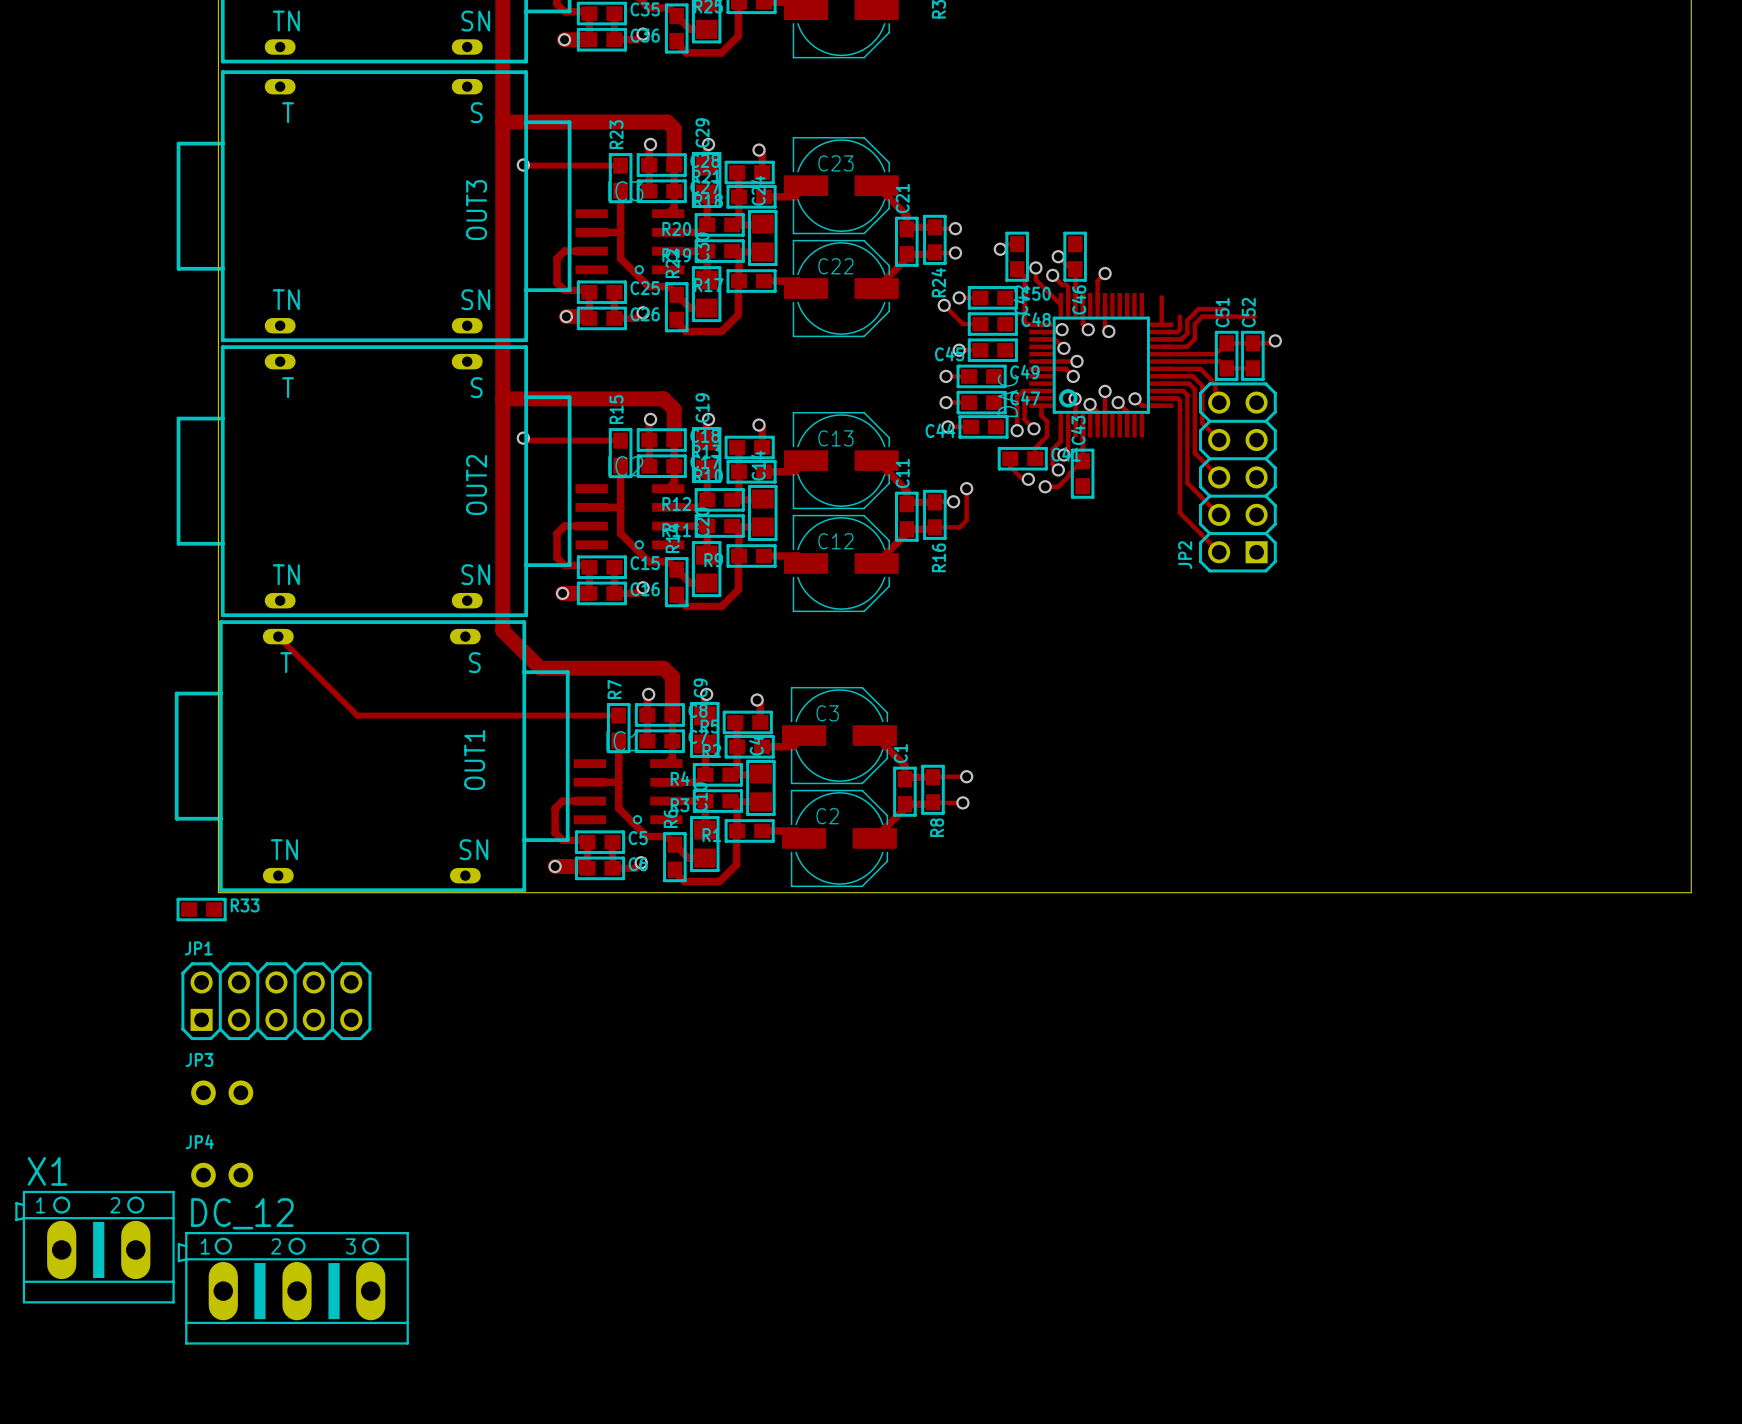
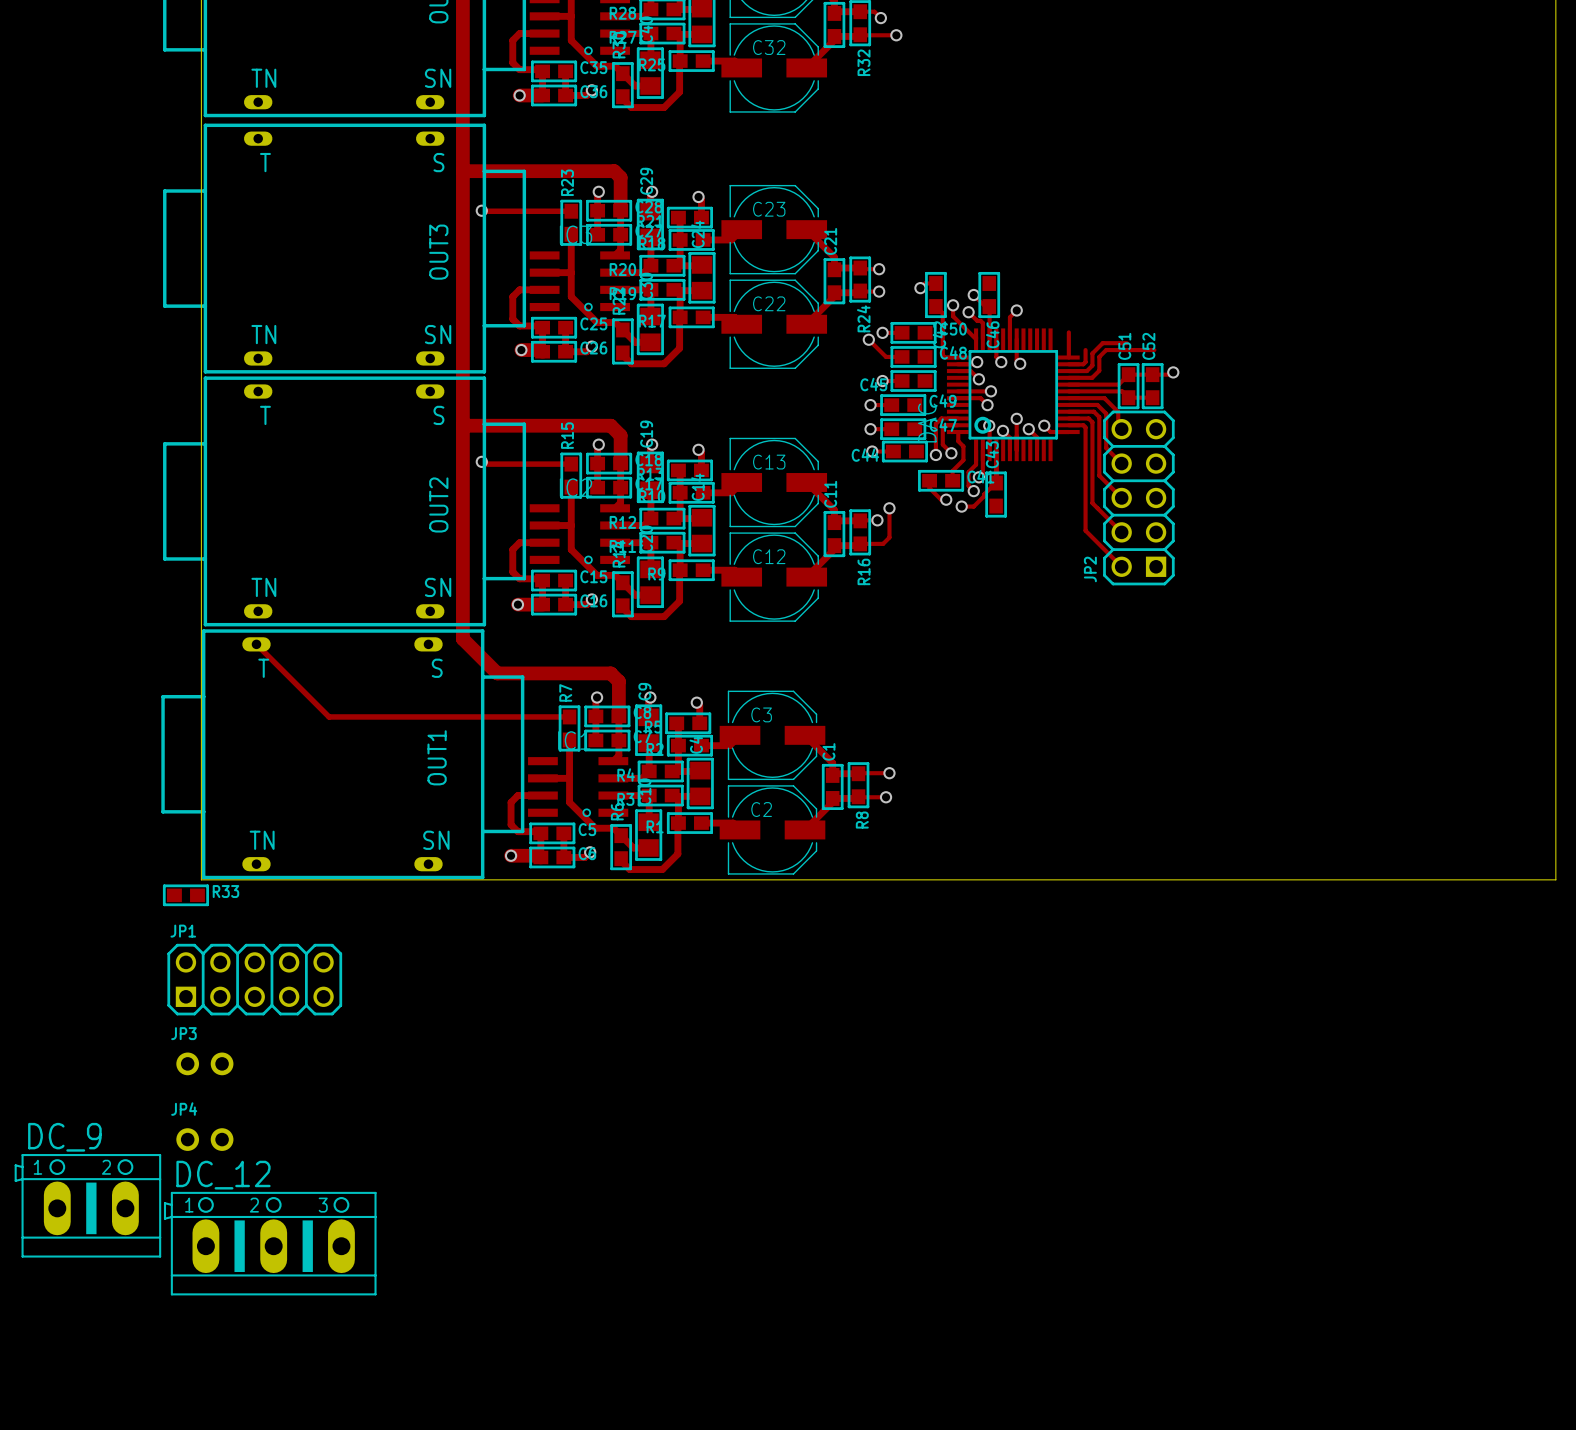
X1 name: X1 (47, 1171) -> DC_9 (64, 1137)

